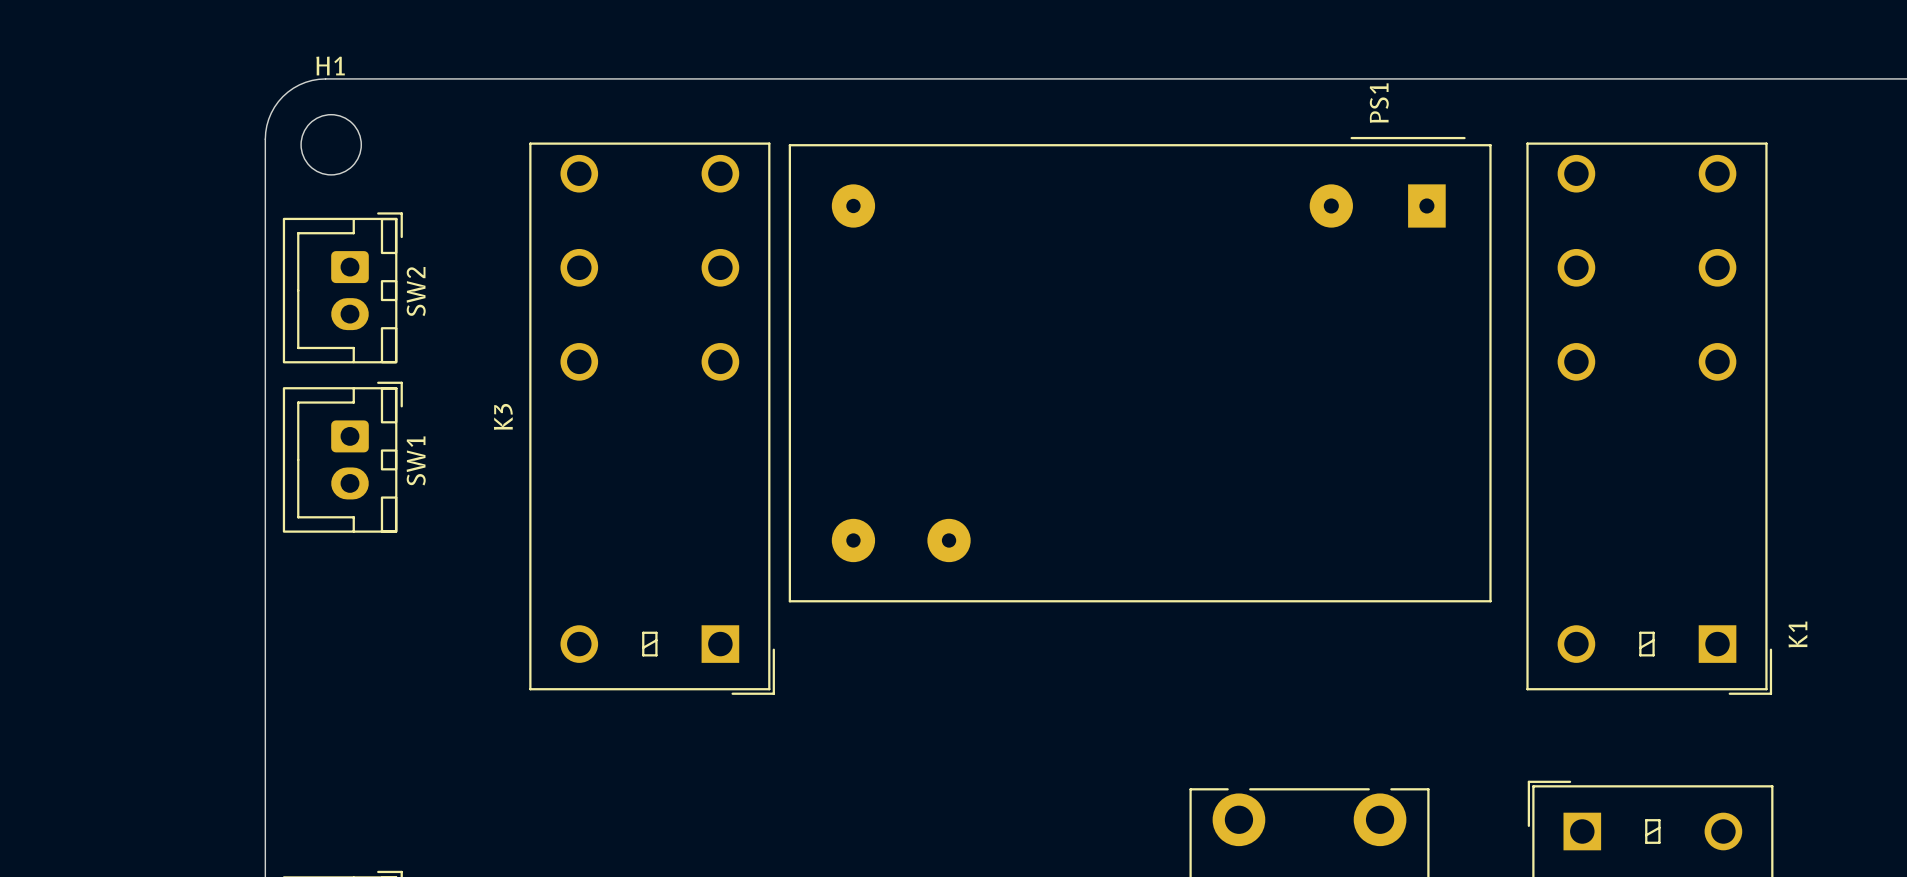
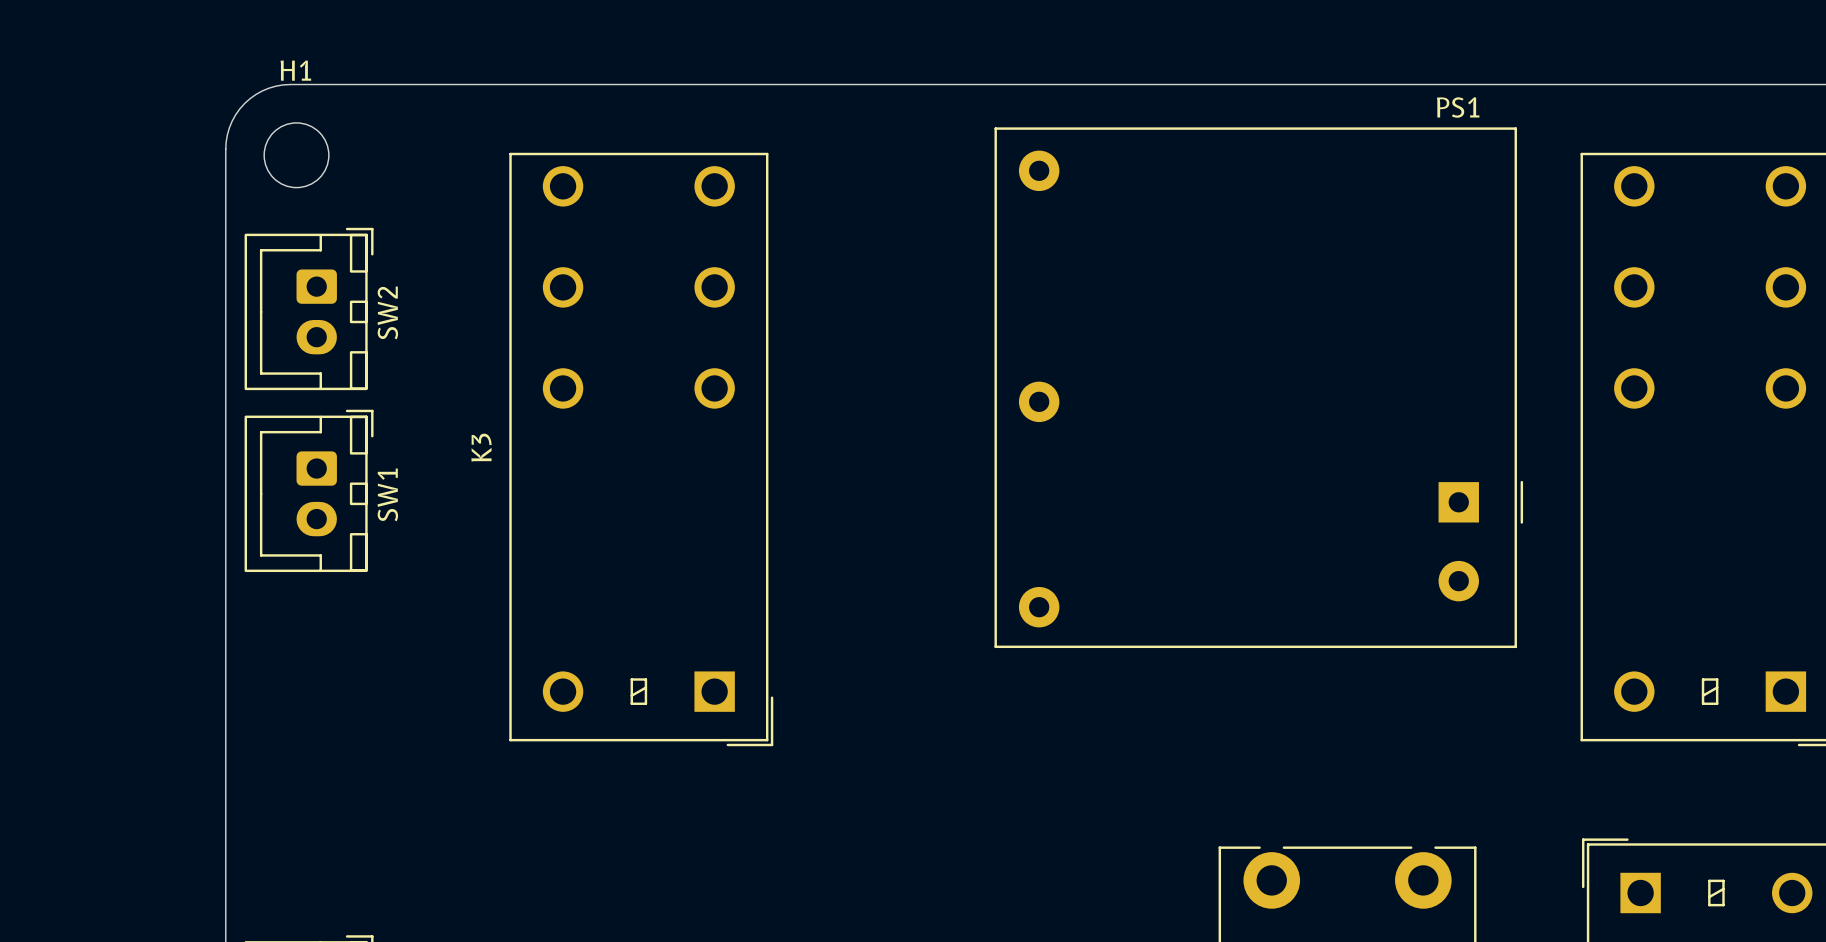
PS1 name position: PS1 (1379, 103) -> PS1 (1458, 107)
PS1 footprint: [788, 136, 1492, 603] -> [994, 127, 1524, 649]

